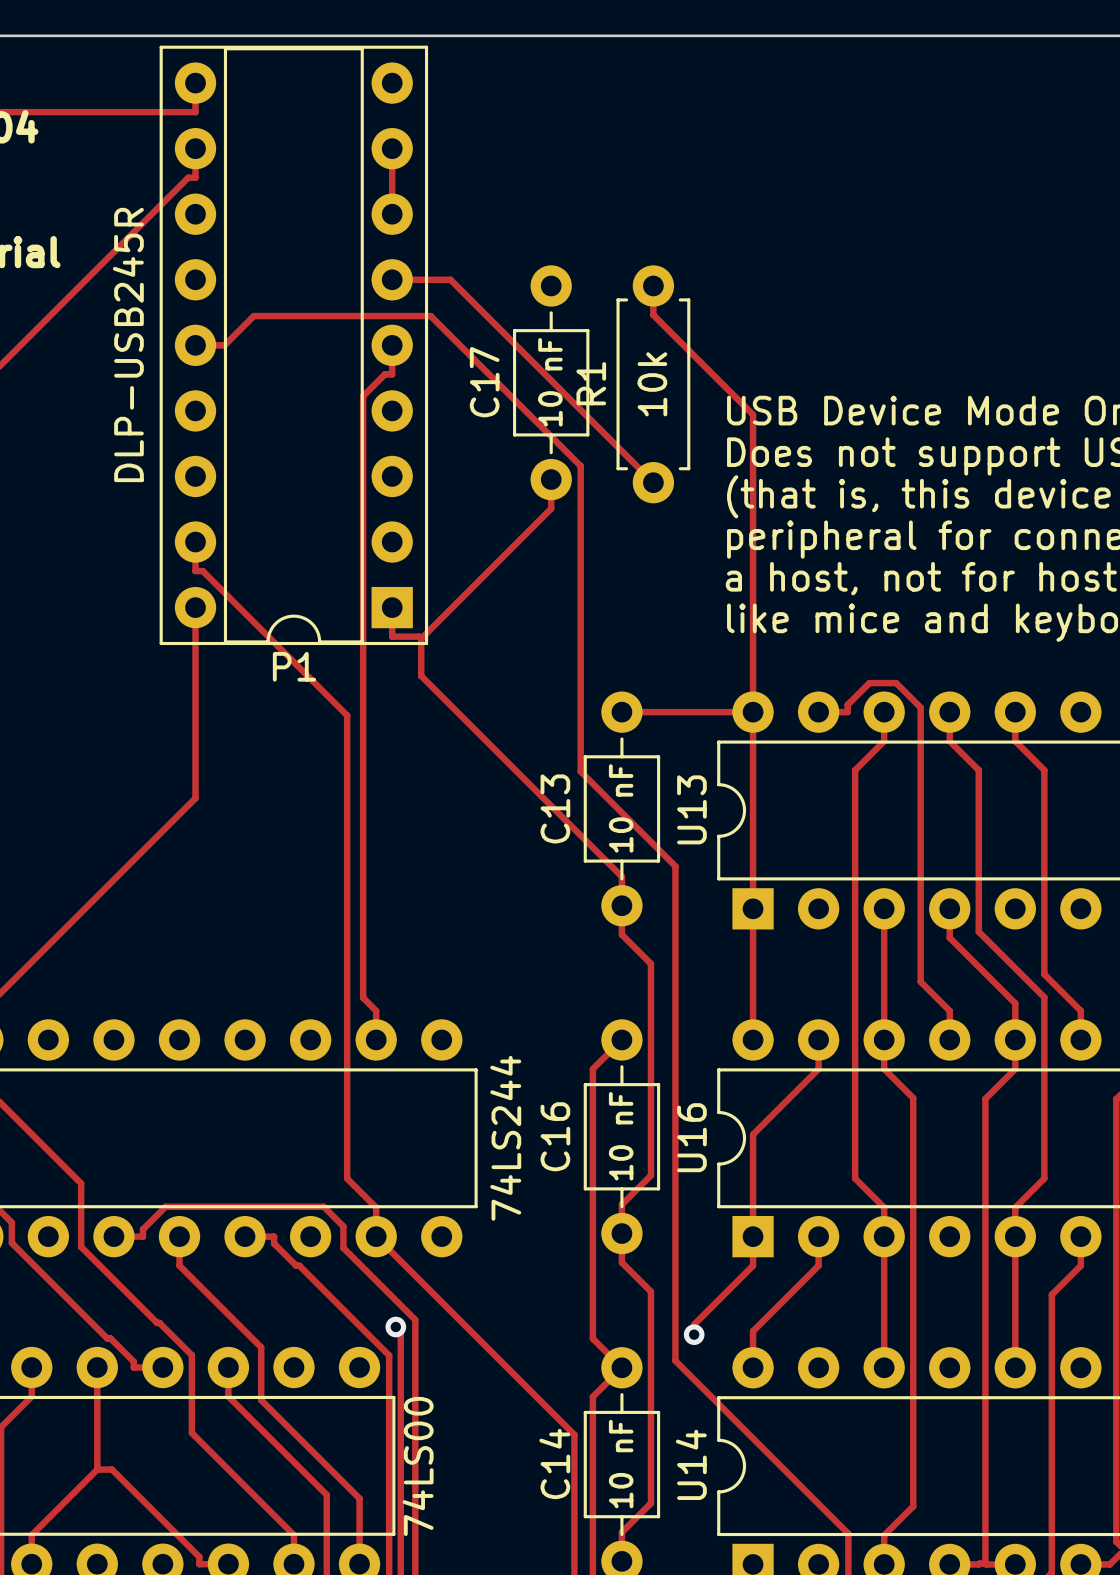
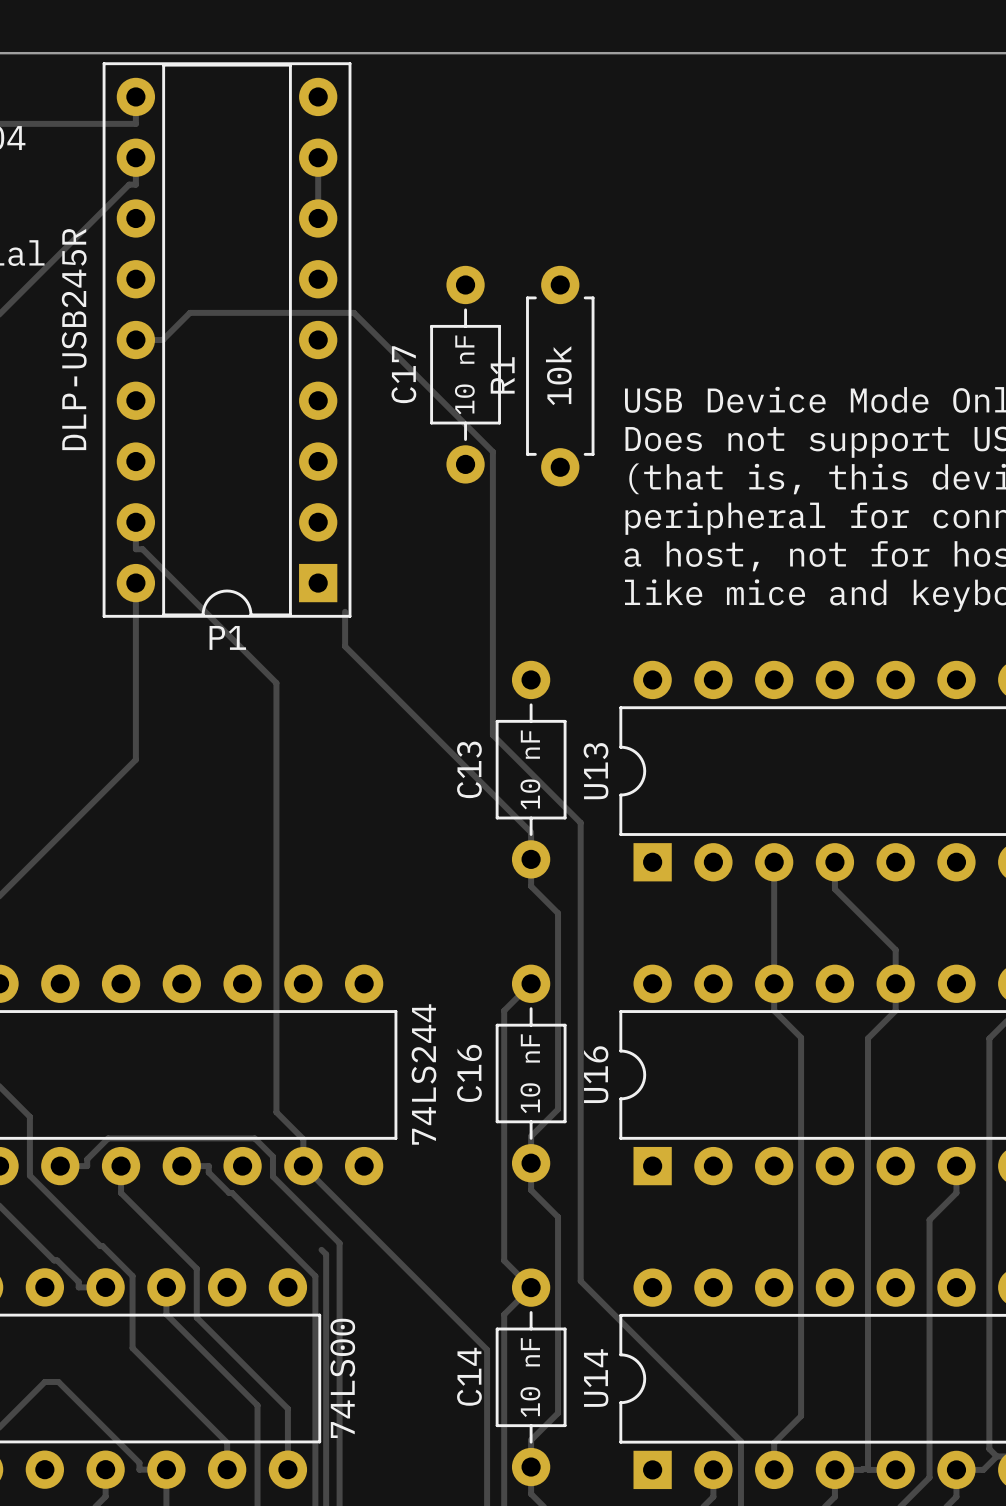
track: (392, 279) (450, 279) (653, 482) -> none
track: (653, 285) (653, 315) (753, 414) (753, 1039) -> none
track: (392, 345) (392, 374) (384, 374) (363, 396) (363, 997) (376, 1010) (376, 1039) -> none
track: (551, 479) (551, 508) (421, 638) (419, 636) (392, 636) (392, 607) -> none
track: (621, 712) (753, 712) -> none
track: (818, 712) (847, 712) (847, 704) (869, 683) (896, 683) (920, 707) (920, 981) (949, 1010) (949, 1039) -> none
track: (884, 712) (884, 741) (855, 770) (855, 1178) (884, 1207) (884, 1367) -> none
track: (949, 712) (949, 741) (978, 770) (978, 931) (1044, 997) (1044, 1178) (1015, 1207) (1015, 1367) -> none
track: (1015, 712) (1015, 741) (1044, 770) (1044, 974) (1080, 1010) (1080, 1039) -> none
track: (818, 1039) (818, 1069) (753, 1134) (753, 1265) (694, 1324) (694, 1334) -> none
track: (818, 1236) (818, 1265) (753, 1331) (753, 1367) -> none
via: (395, 1327) -> none
via: (694, 1334) -> none
track: (97, 1367) (97, 1469) -> none

